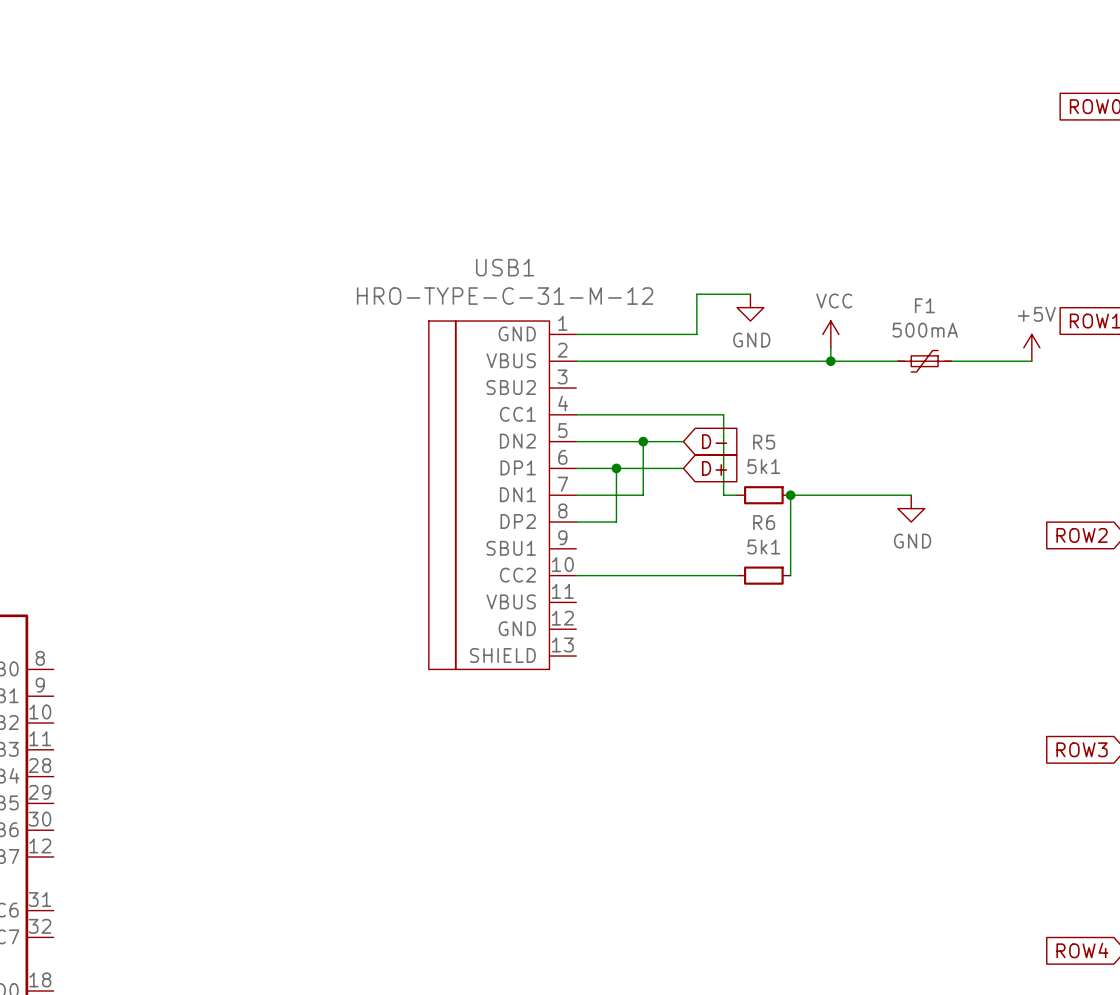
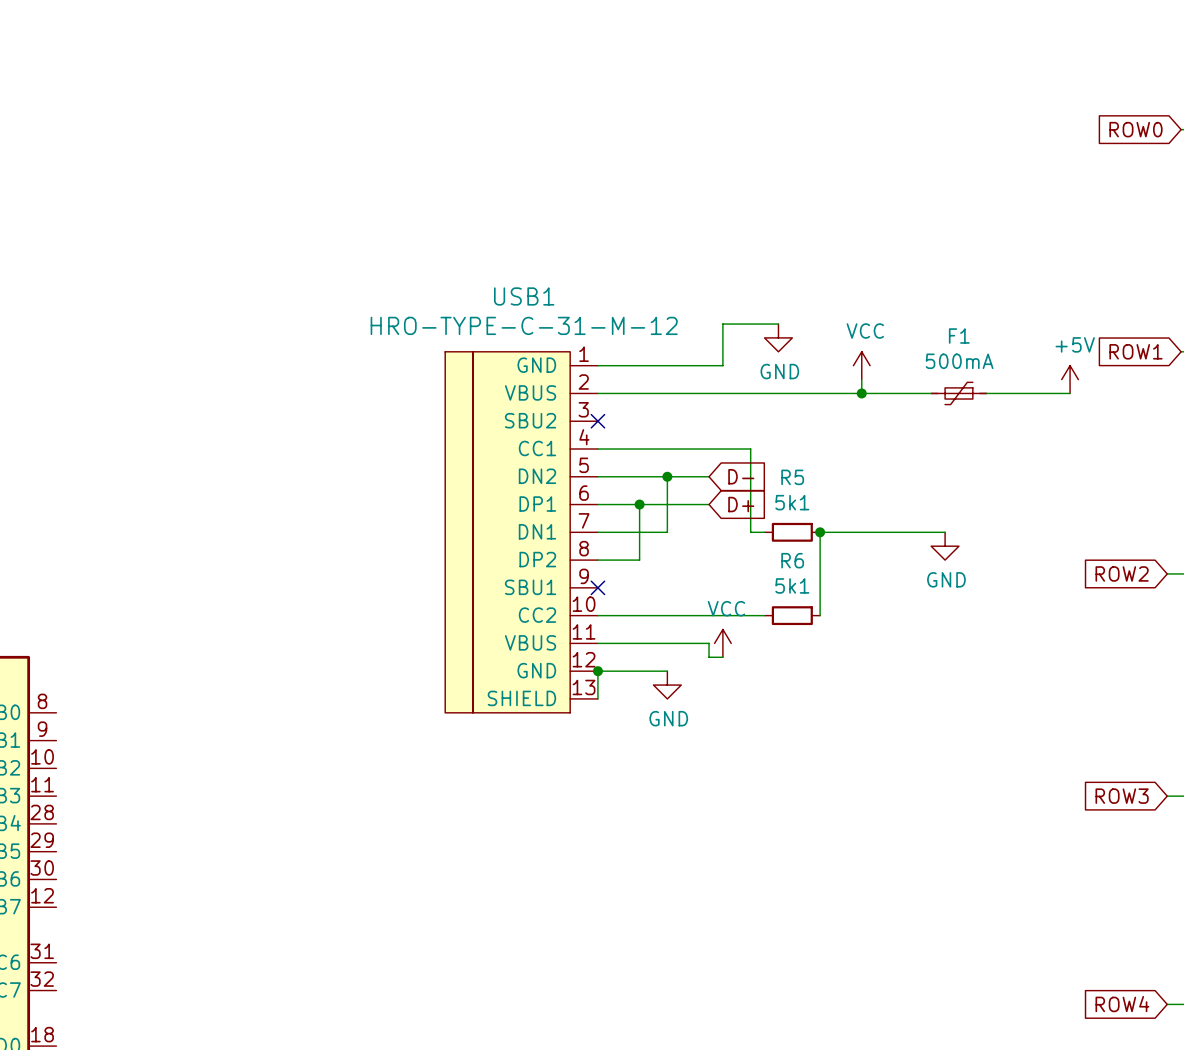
no-connect mark: none -> (597, 421)
no-connect mark: none -> (597, 587)
wire: none -> (597, 643) (709, 643) (709, 657) (722, 657)
power symbol: none -> VCC (722, 643)
junction: none -> (597, 671)
wire: none -> (667, 671) (597, 671) (597, 698)
power symbol: none -> GND (667, 685)

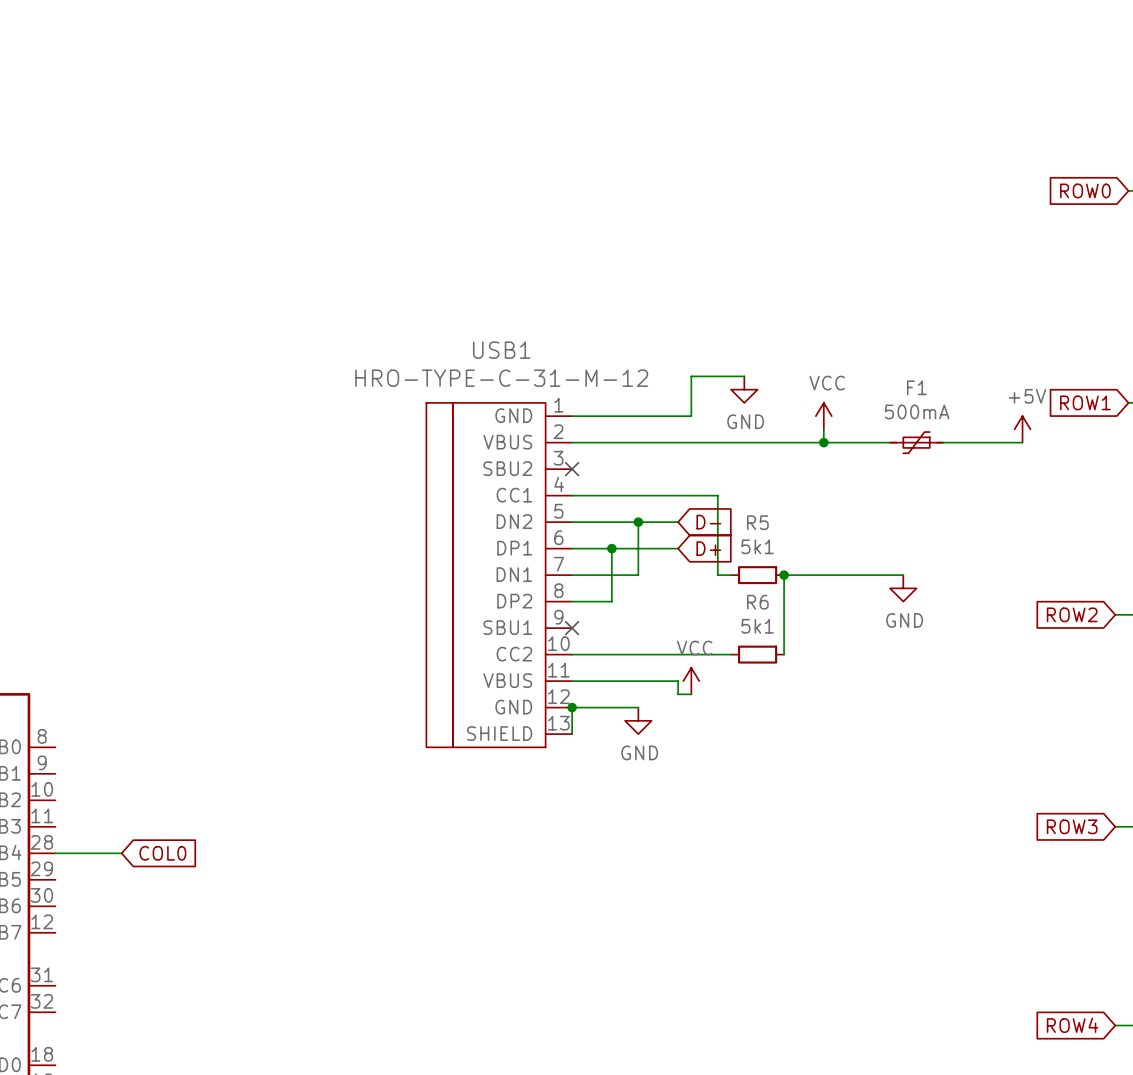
wire: none -> (55, 853) (121, 853)
global label: none -> COL0 (162, 853)

